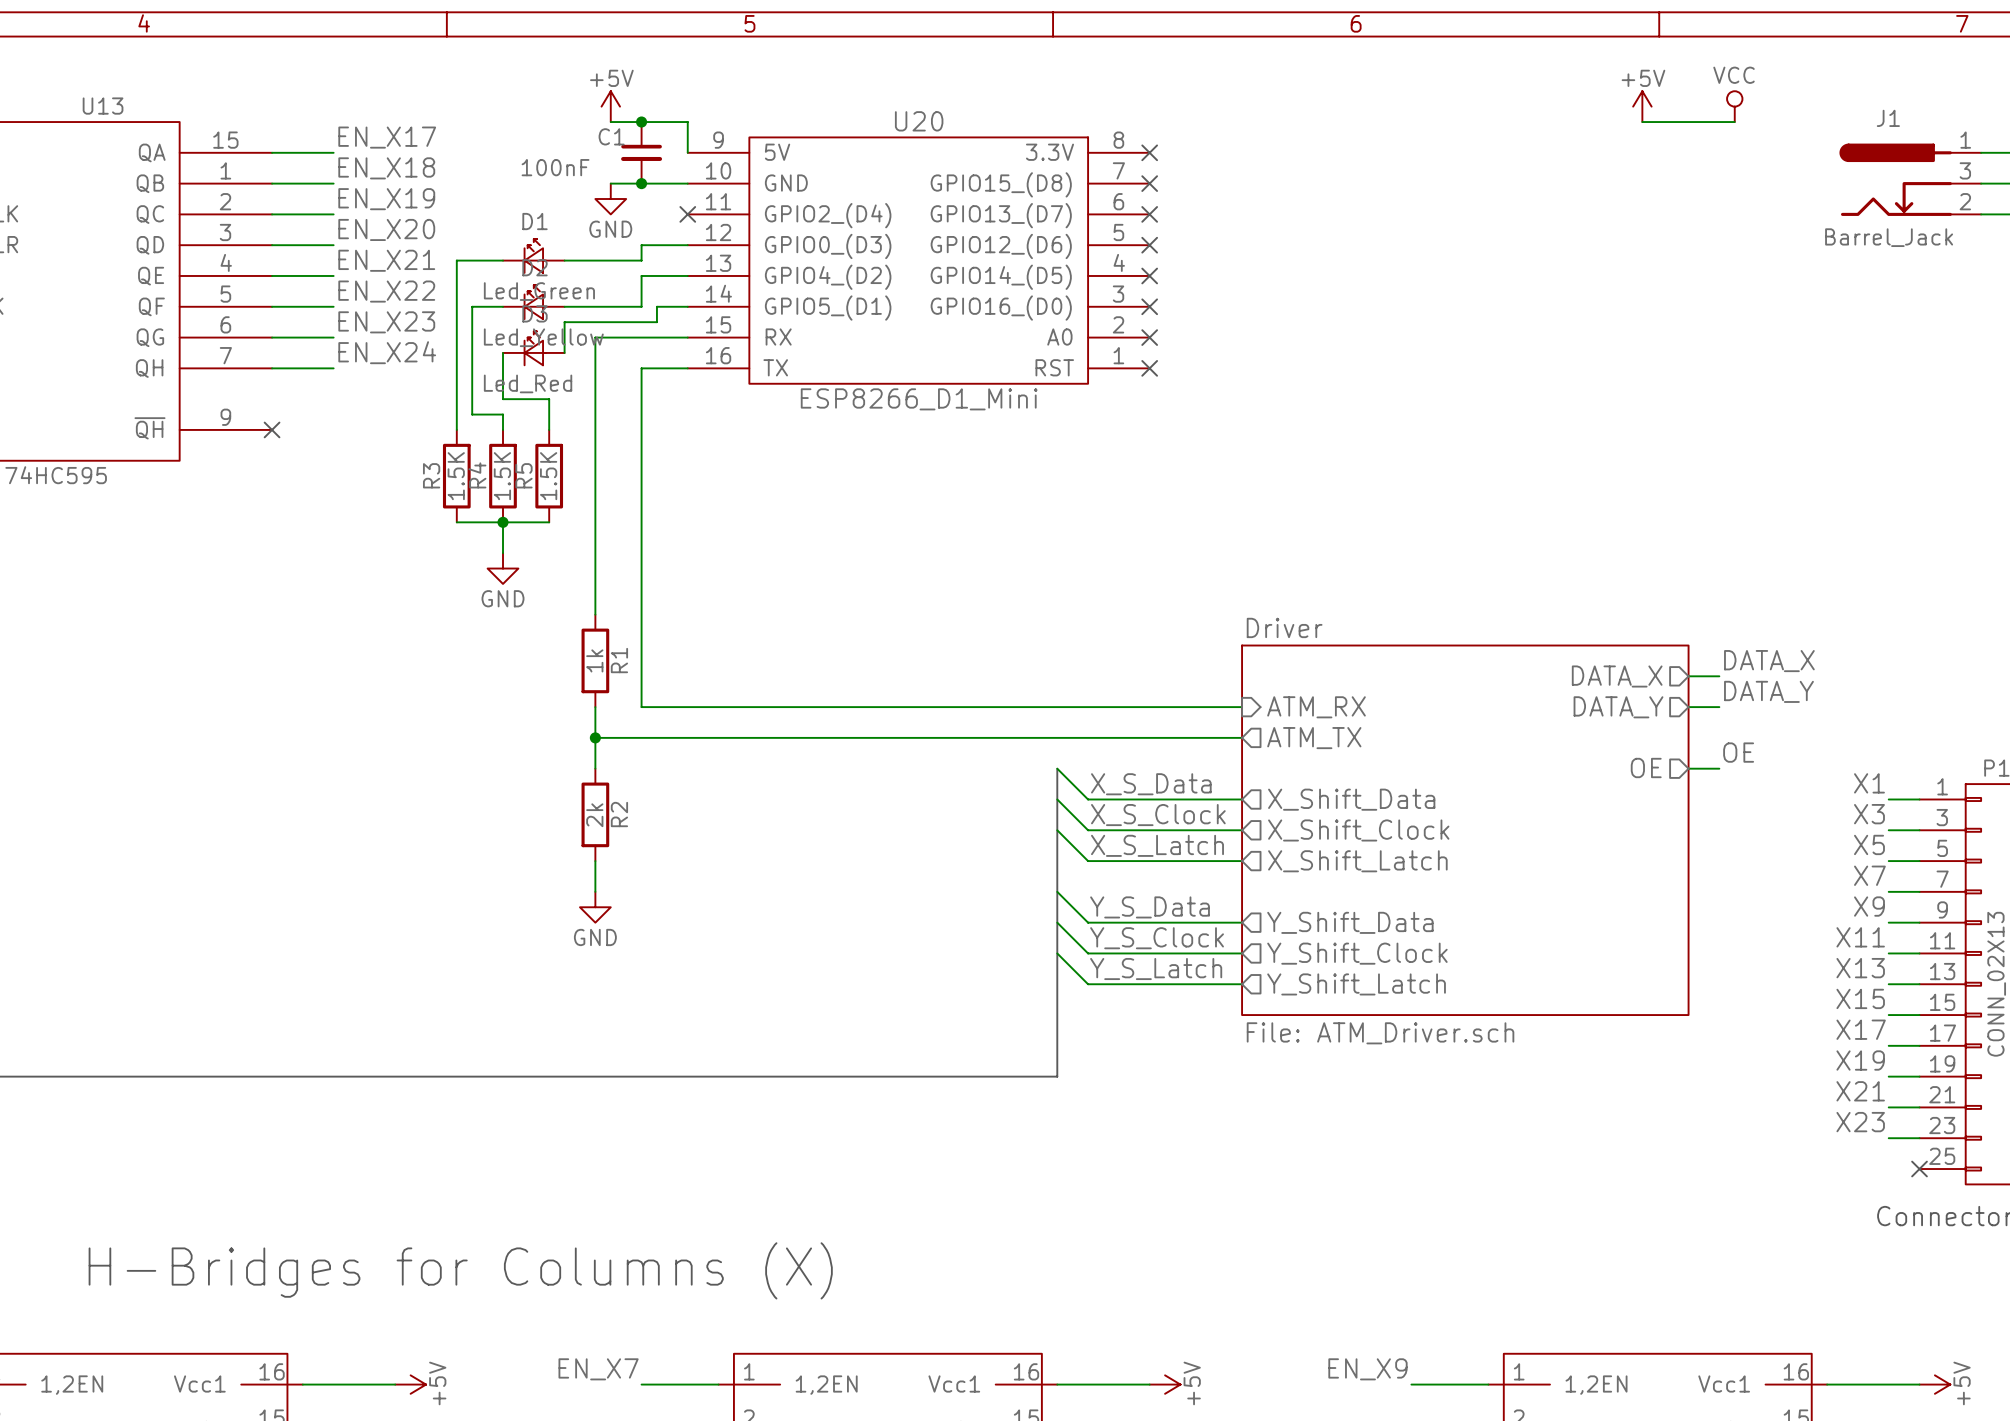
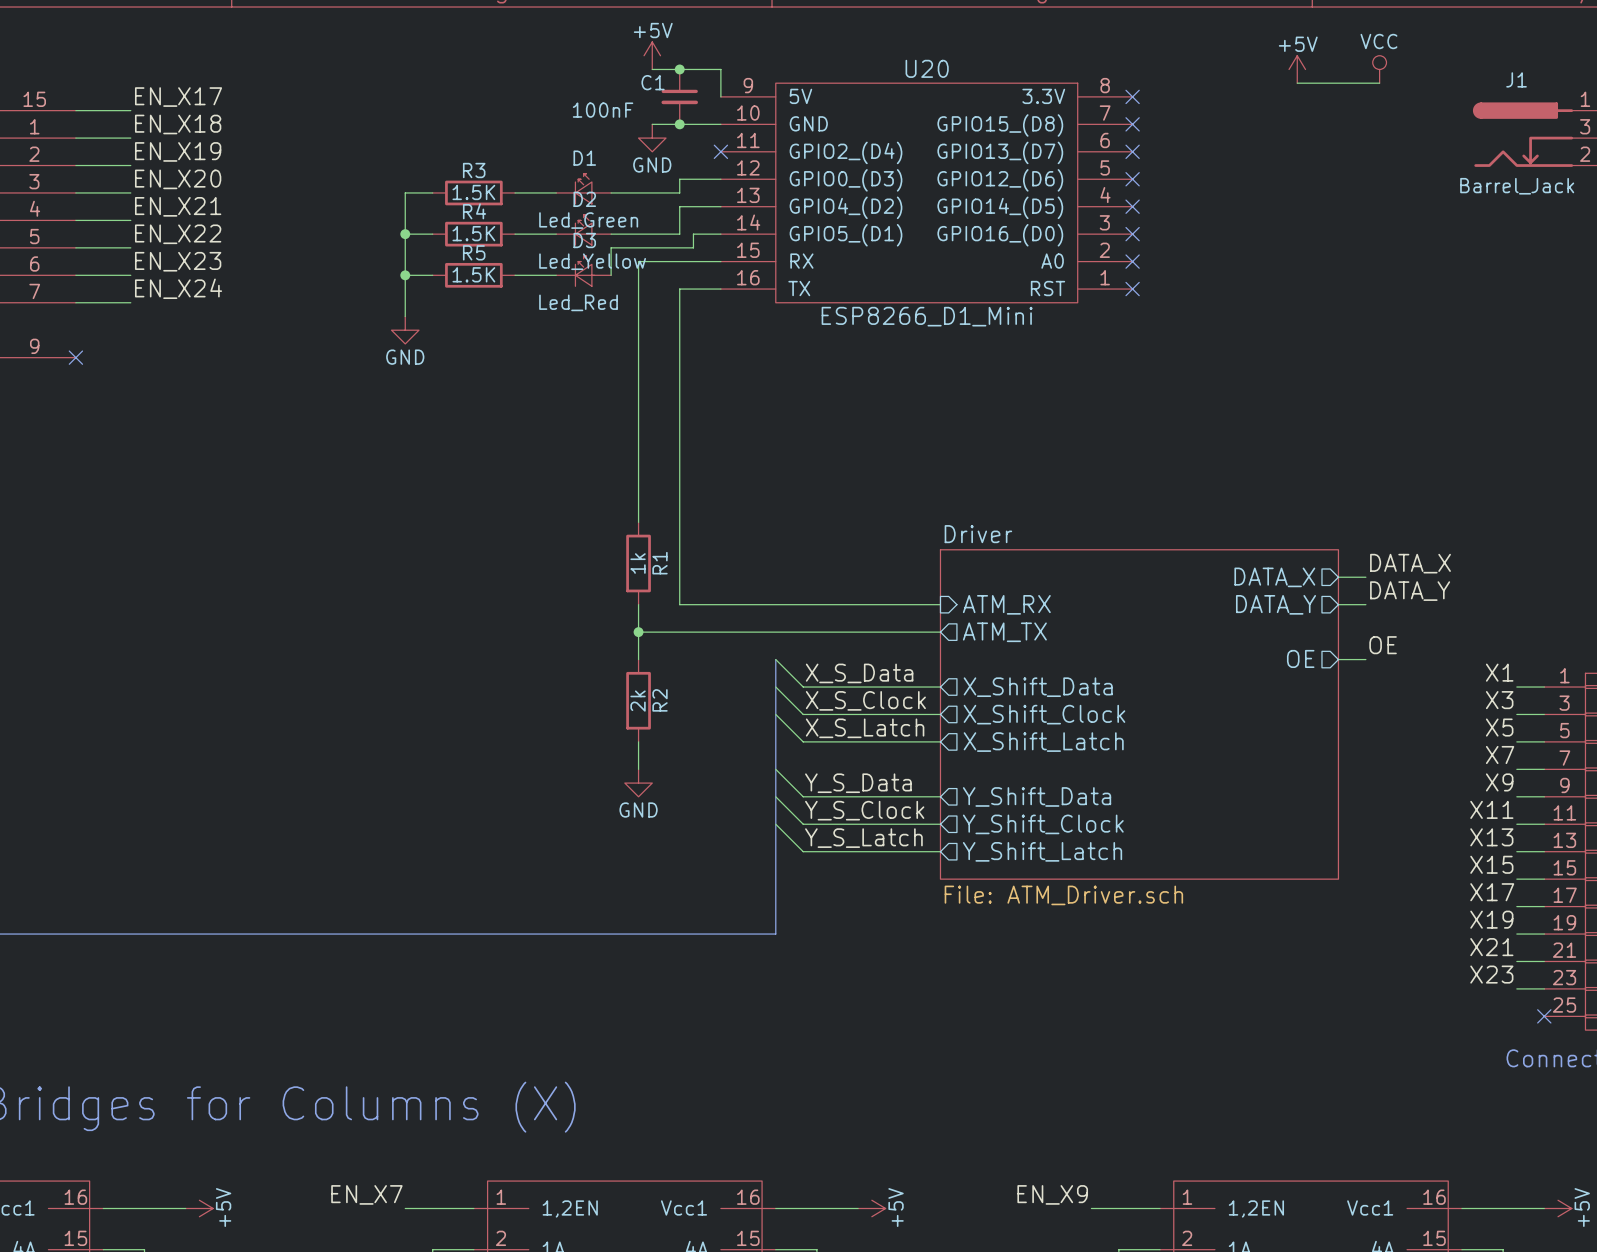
power symbol: none -> +5V (652, 55)
power symbol: +5V (610, 106) -> none
wire: none -> (652, 69) (720, 69) (720, 96)
junction: none -> (679, 69)
wire: (610, 122) (687, 122) (687, 152) -> none
junction: (641, 122) -> none
no-connect mark: none -> (1132, 96)
C1 position: (641, 152) -> (679, 96)
no-connect mark: (1149, 152) -> none
wire: none -> (652, 124) (720, 124)
junction: none -> (679, 124)
no-connect mark: none -> (1132, 124)
wire: (610, 183) (687, 183) -> none
junction: (641, 183) -> none
power symbol: none -> GND (652, 138)
no-connect mark: (1149, 183) -> none
power symbol: GND (610, 199) -> none
no-connect mark: none -> (720, 151)
no-connect mark: none -> (1132, 151)
no-connect mark: (687, 214) -> none
no-connect mark: (1149, 214) -> none
wire: none -> (720, 179) (679, 179) (679, 192) (611, 192)
no-connect mark: none -> (1132, 179)
wire: none -> (515, 192) (556, 192)
no-connect mark: (1149, 245) -> none
D1 position: (533, 255) -> (583, 188)
wire: (503, 260) (456, 260) (456, 429) -> none
wire: (564, 260) (641, 260) -> none
U20 position: (918, 260) -> (926, 192)
wire: none -> (720, 206) (679, 206) (679, 234) (611, 234)
no-connect mark: none -> (1132, 206)
wire: (641, 275) (687, 275) -> (405, 220) (405, 206)
no-connect mark: (1149, 275) -> none
wire: none -> (405, 234) (432, 234)
junction: none -> (405, 234)
wire: none -> (515, 234) (556, 234)
wire: none -> (720, 234) (693, 234) (693, 247) (611, 247) (611, 275)
no-connect mark: none -> (1132, 234)
D2 position: (533, 302) -> (583, 230)
wire: (503, 306) (472, 306) (472, 414) (503, 414) (503, 429) -> none
wire: (564, 306) (641, 306) -> none
wire: (687, 306) (656, 306) (656, 322) (564, 322) (564, 352) -> none
no-connect mark: (1149, 306) -> none
wire: none -> (720, 261) (638, 261) (638, 522)
no-connect mark: none -> (1132, 261)
wire: (641, 337) (595, 337) (595, 614) -> none
junction: none -> (405, 275)
wire: none -> (515, 275) (556, 275)
no-connect mark: (1149, 337) -> none
D3 position: (533, 348) -> (583, 271)
wire: (503, 352) (503, 399) (549, 399) (549, 429) -> none
no-connect mark: none -> (1132, 289)
wire: (641, 368) (687, 368) -> (405, 302) (405, 247)
no-connect mark: (1149, 368) -> none
wire: (641, 383) (641, 707) (949, 707) -> (720, 289) (679, 289) (679, 604)
power symbol: none -> GND (405, 330)
R3 rotation: 0° (456, 476) -> 90° clockwise (473, 192)
R3 position: (456, 476) -> (473, 192)
R4 rotation: 0° (503, 476) -> 90° clockwise (473, 234)
R4 position: (503, 476) -> (473, 234)
R5 rotation: 0° (549, 476) -> 90° clockwise (473, 275)
R5 position: (549, 476) -> (473, 275)
wire: (456, 522) (549, 522) -> none
wire: (503, 522) (503, 553) -> none
junction: (503, 522) -> none
power symbol: GND (503, 568) -> none
R1 position: (595, 660) -> (638, 563)
wire: (595, 707) (595, 768) -> none
wire: none -> (638, 604) (638, 659)
wire: (595, 737) (903, 737) -> none
junction: (595, 737) -> none
junction: none -> (638, 632)
R2 position: (595, 814) -> (638, 700)
wire: (595, 861) (595, 891) -> none
wire: none -> (638, 741) (638, 769)
power symbol: GND (595, 907) -> none
power symbol: none -> GND (638, 783)

